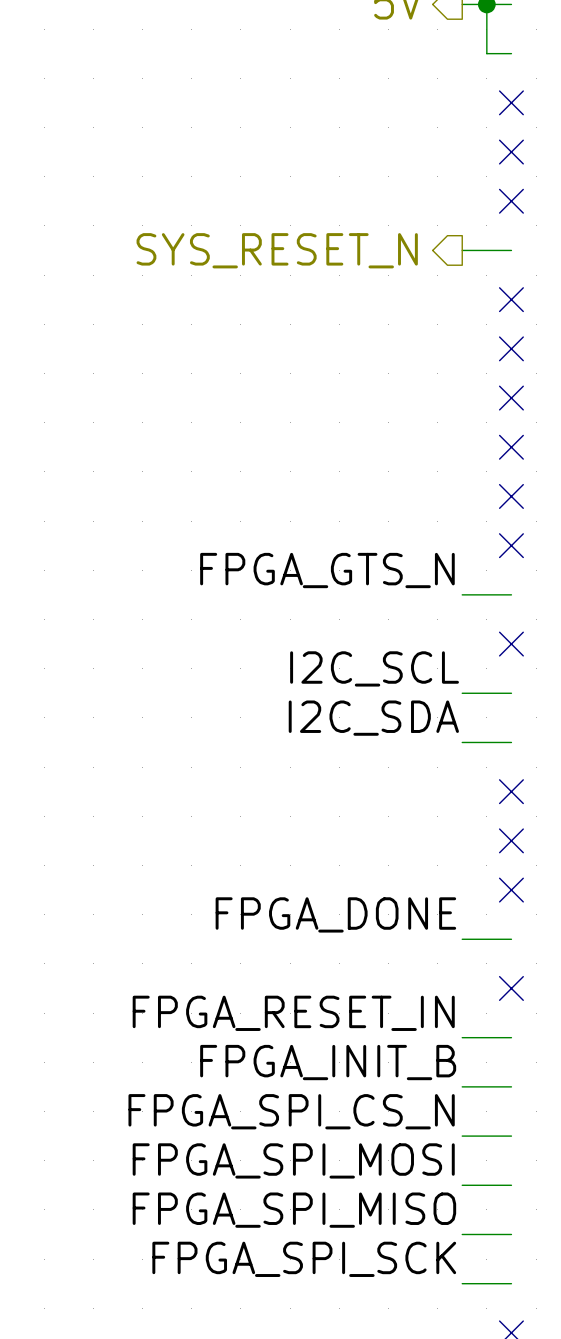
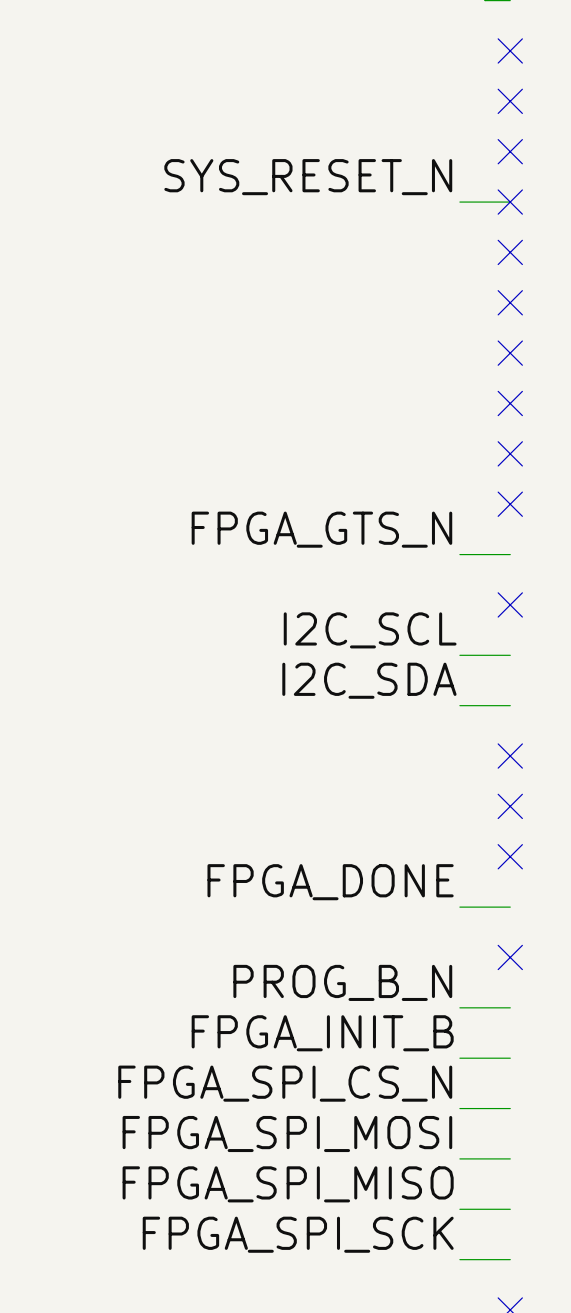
label: none -> SYS_RESET_N (308, 177)
hierarchical label: SYS_RESET_N (277, 250) -> none
no-connect mark: none -> (510, 202)
label: FPGA_RESET_IN (293, 1013) -> PROG_B_N (342, 982)

